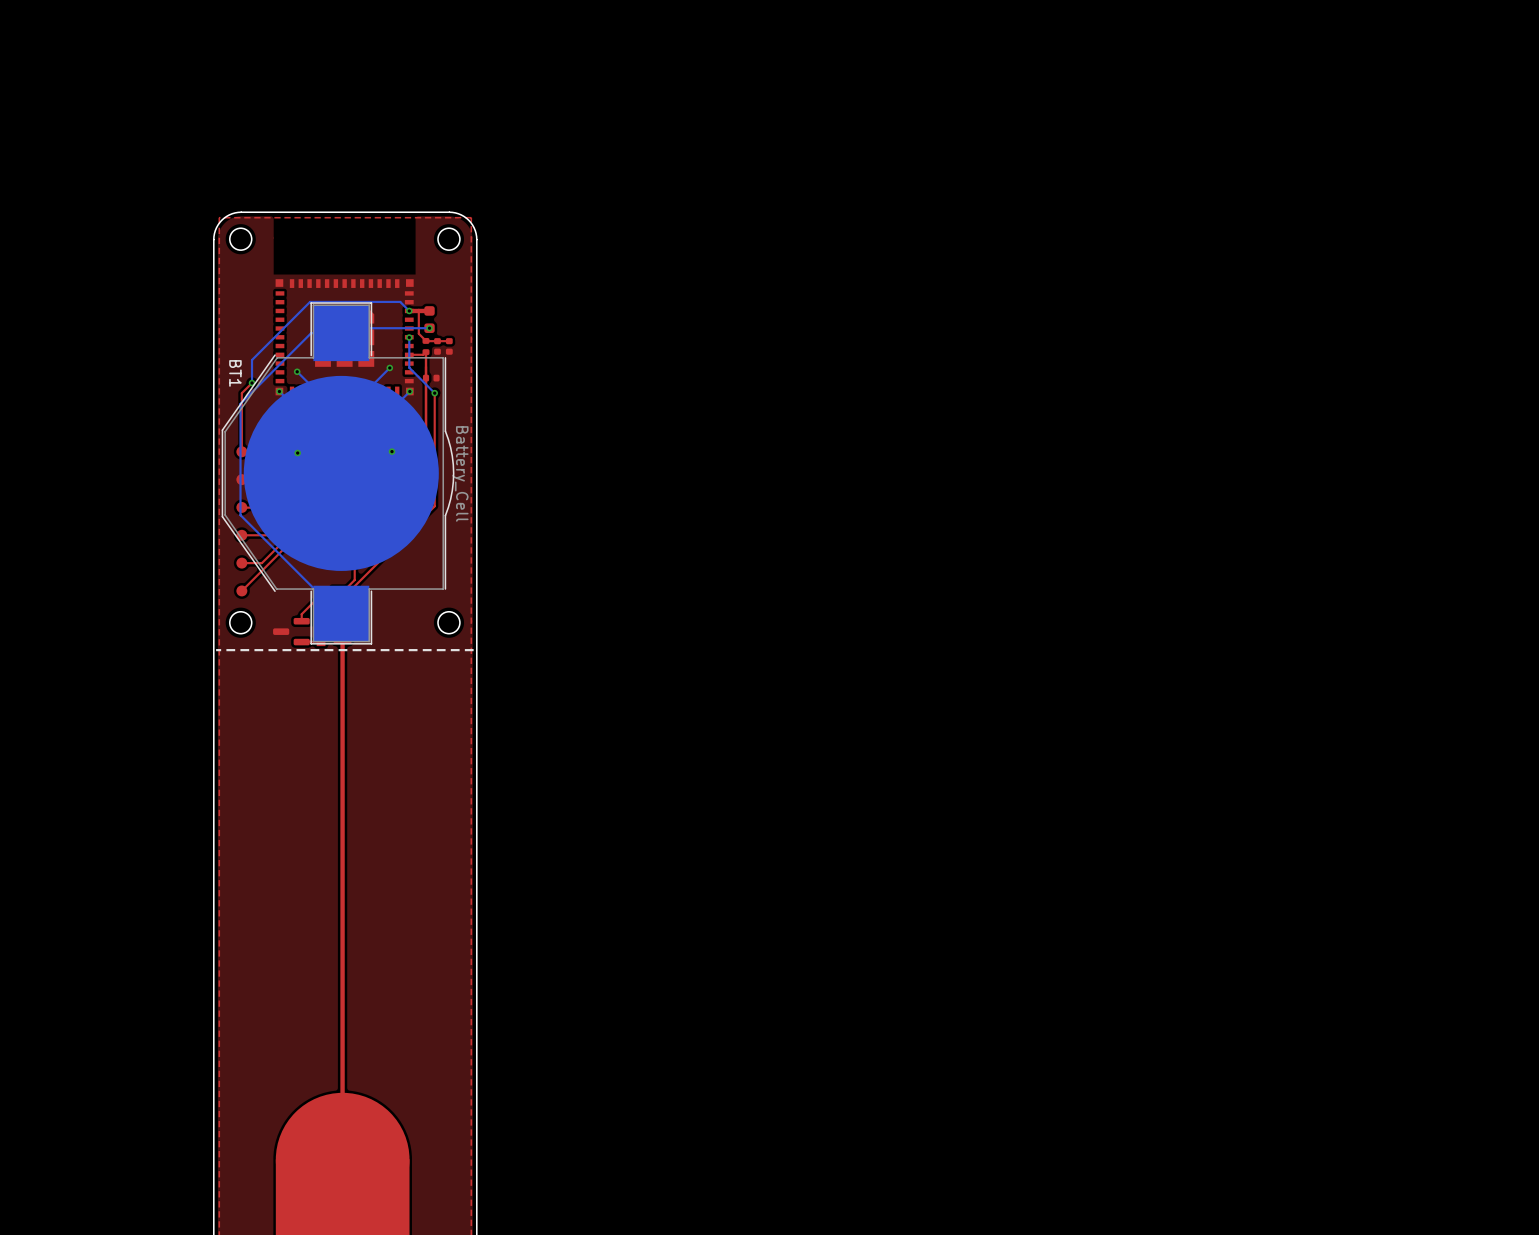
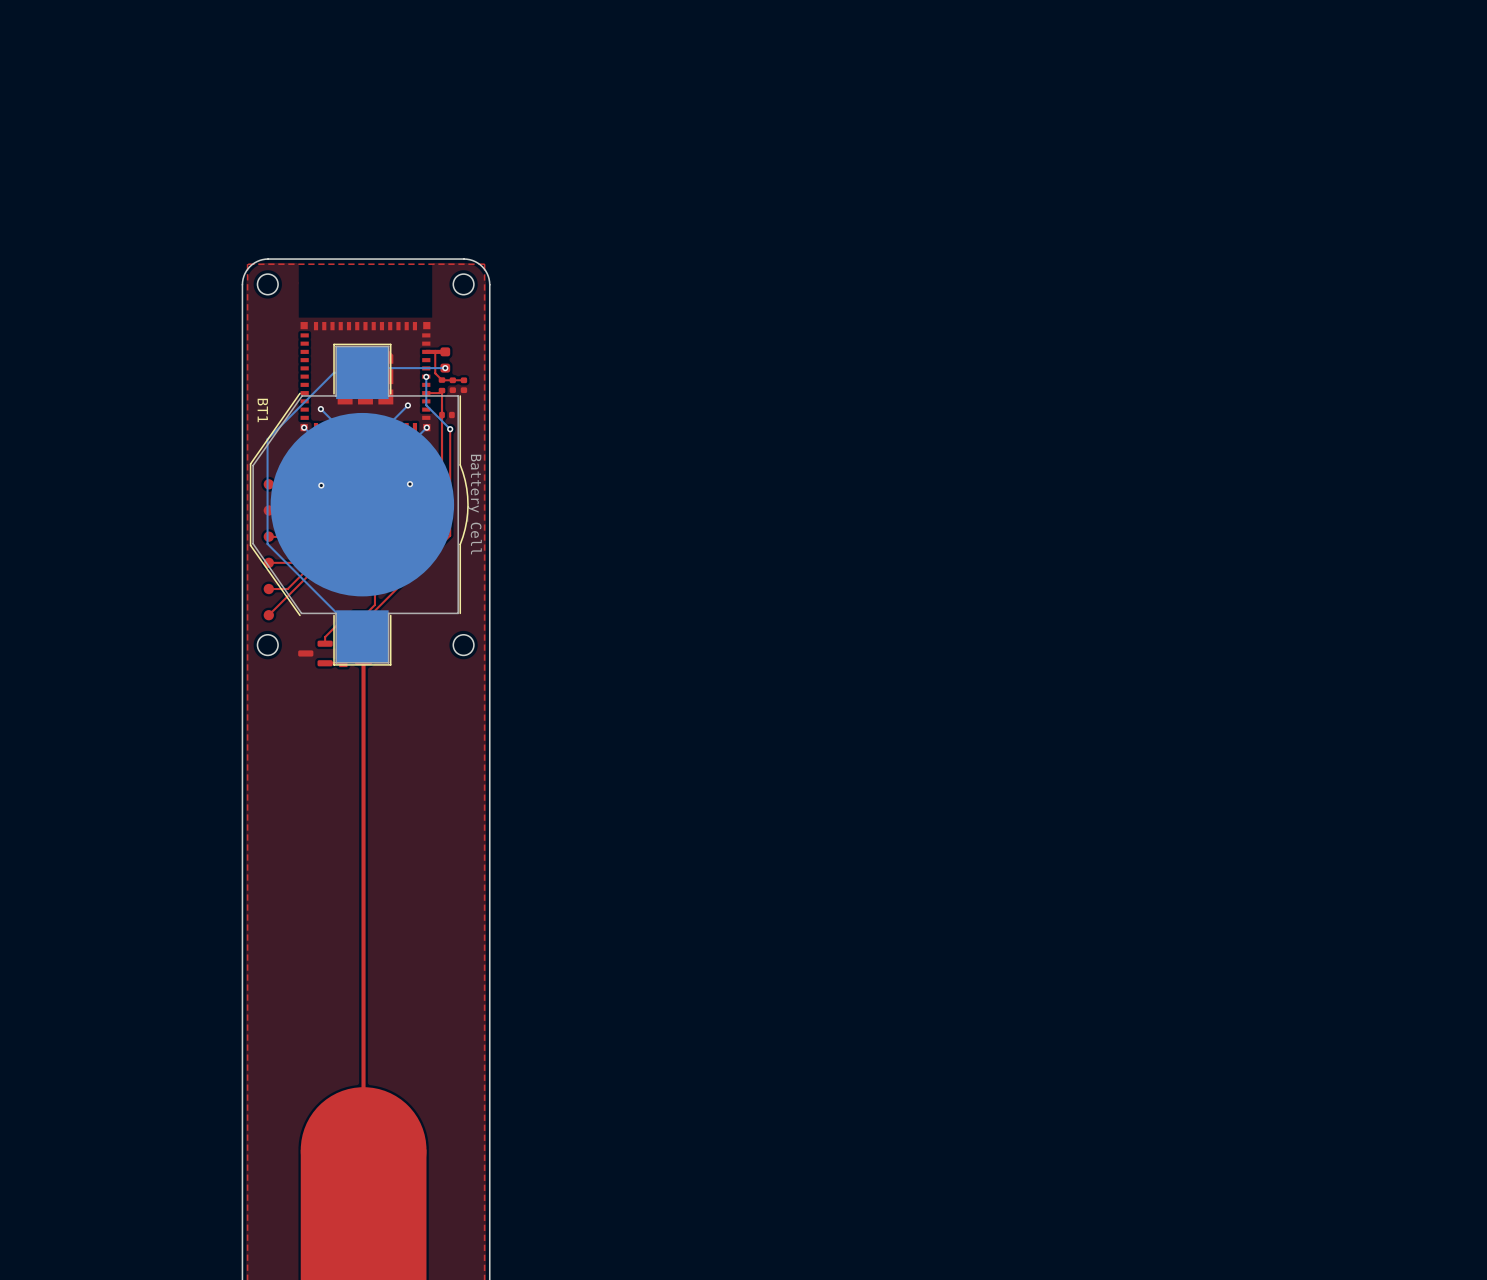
bottom track: (409, 310) (400, 301) (310, 301) (252, 360) (252, 383) -> none
via: (409, 310) -> none
top track: (252, 383) (241, 393) (241, 451) -> none
via: (252, 383) -> none
line: (473, 650) (216, 650) -> none

